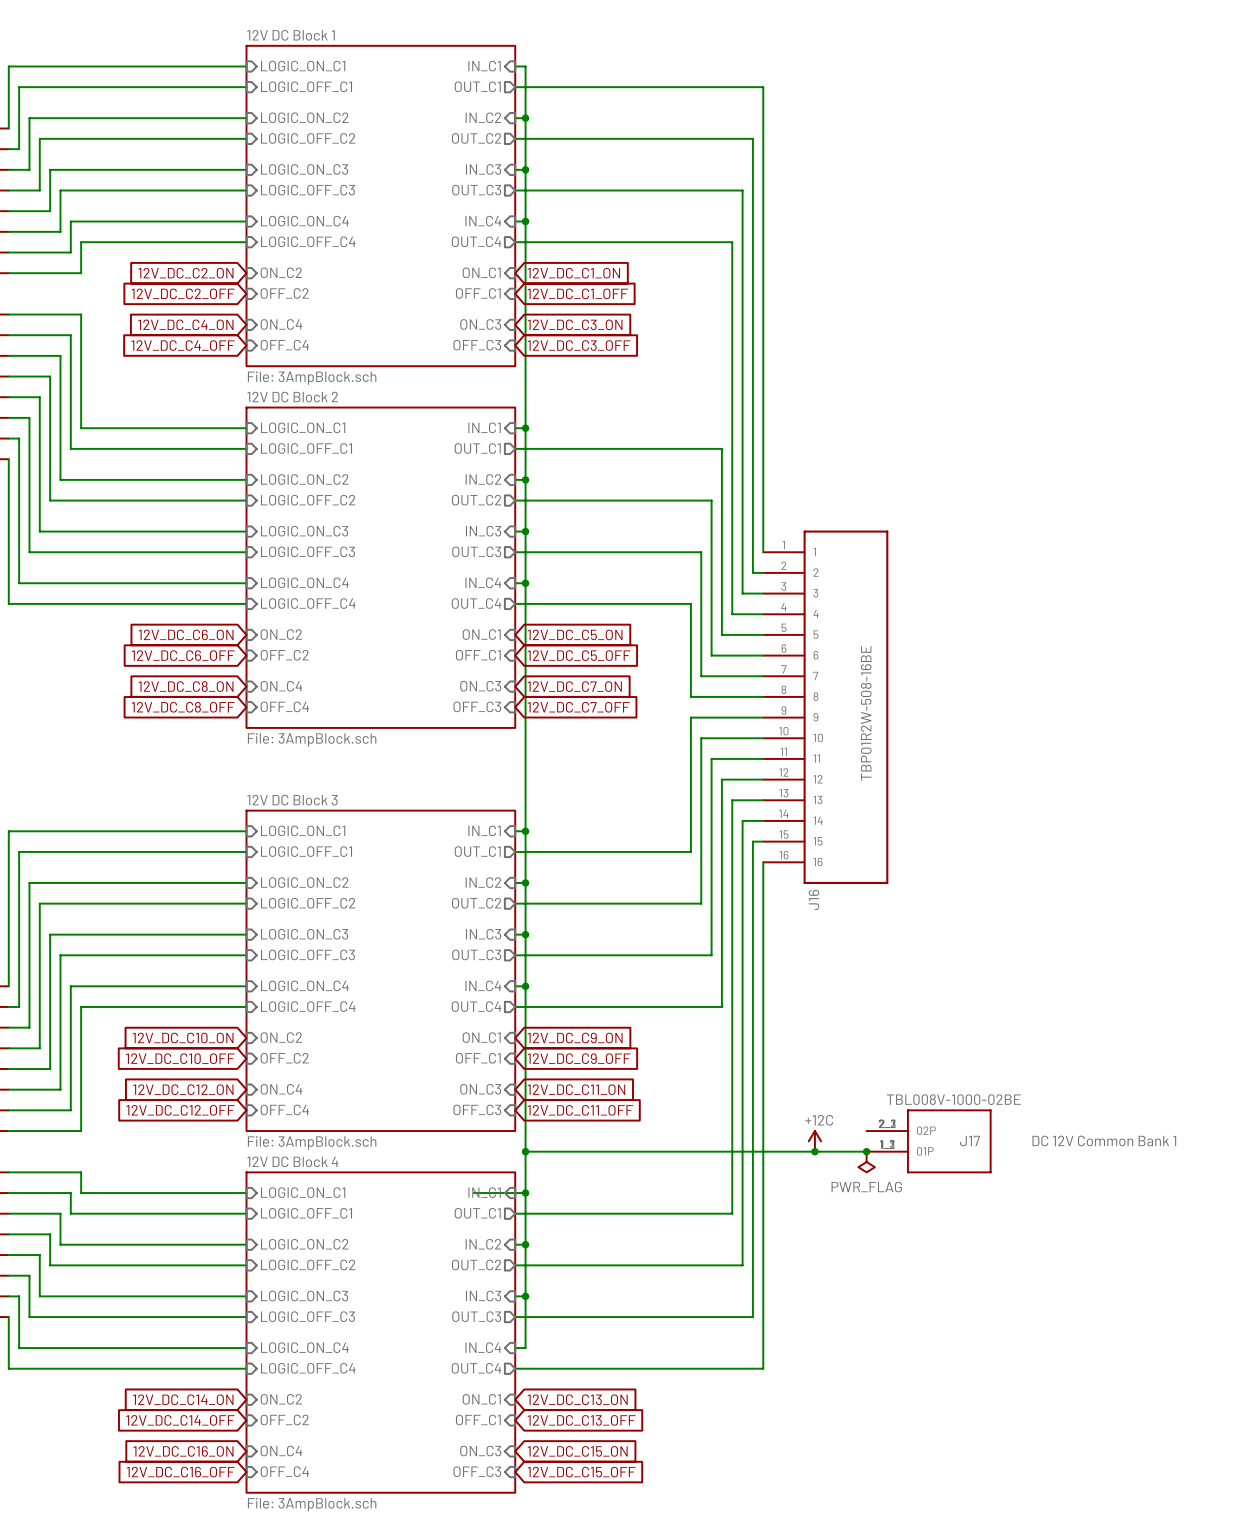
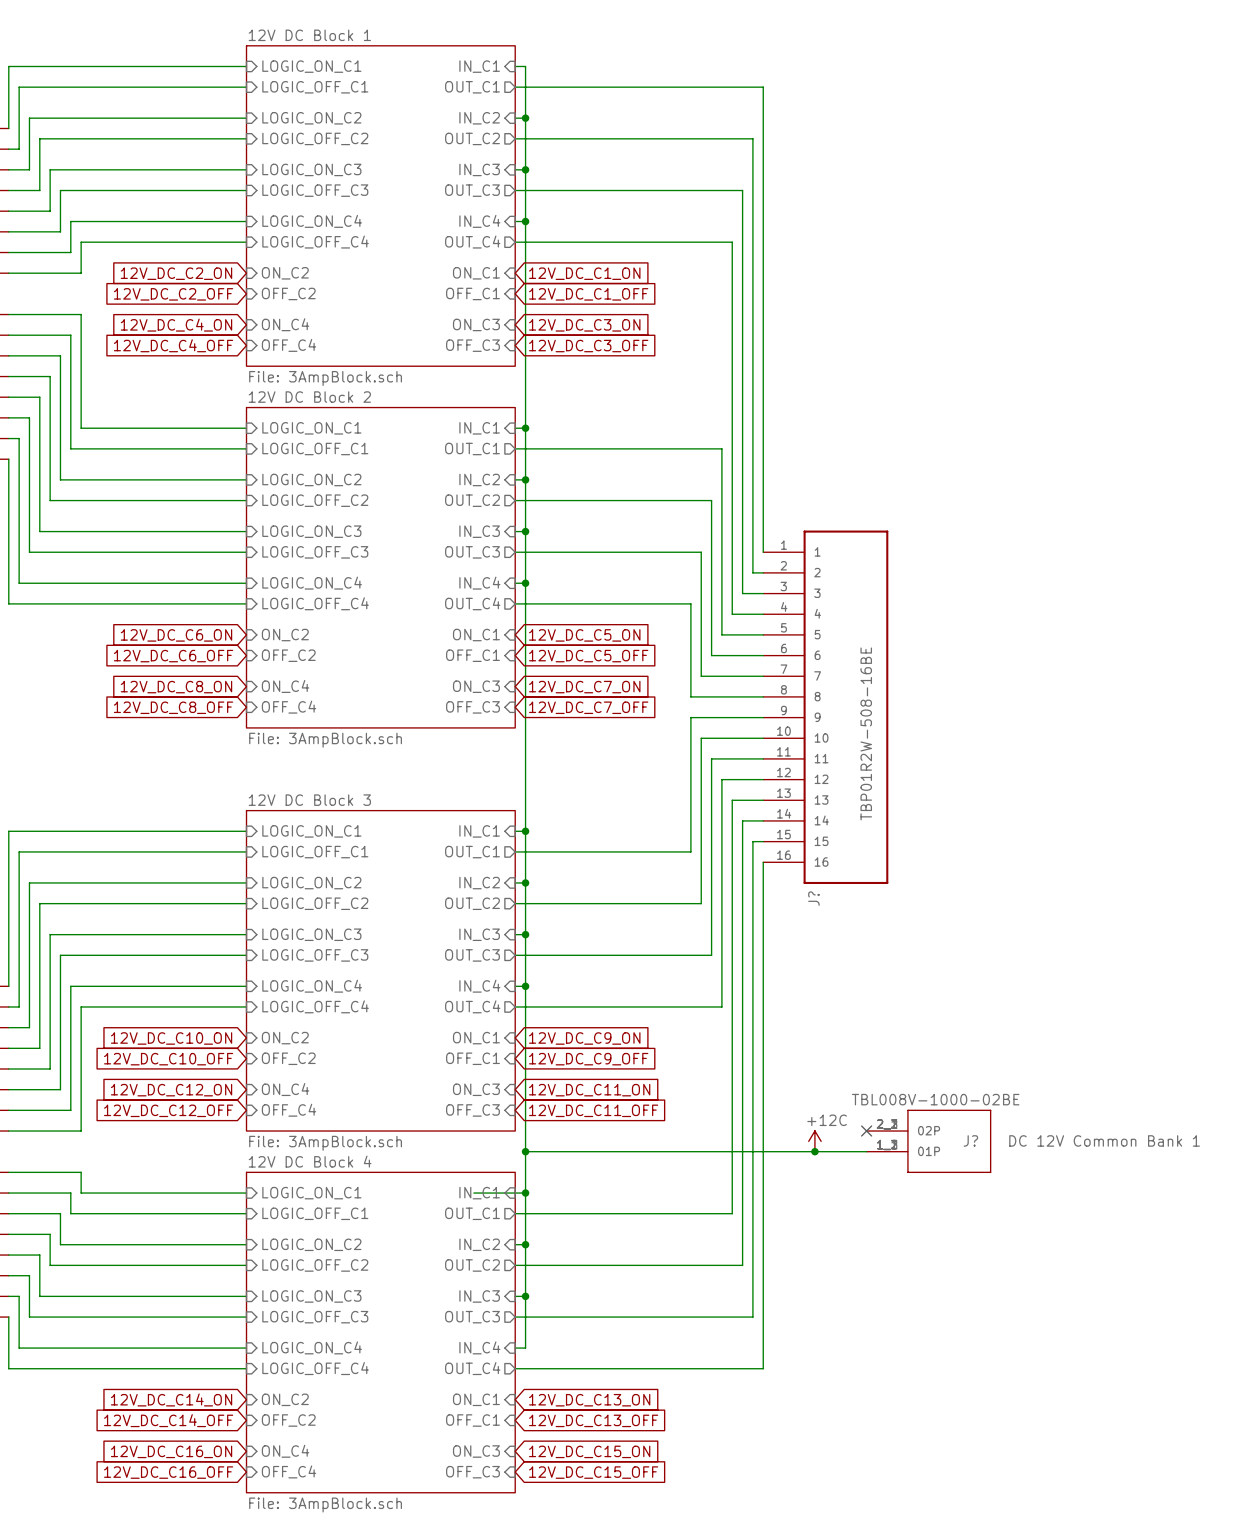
J16 name: J16 (813, 899) -> J? (813, 898)
no-connect mark: none -> (866, 1131)
J17 name: J17 (970, 1141) -> J? (970, 1140)
junction: (866, 1151) -> none
power symbol: PWR_FLAG (866, 1162) -> none

